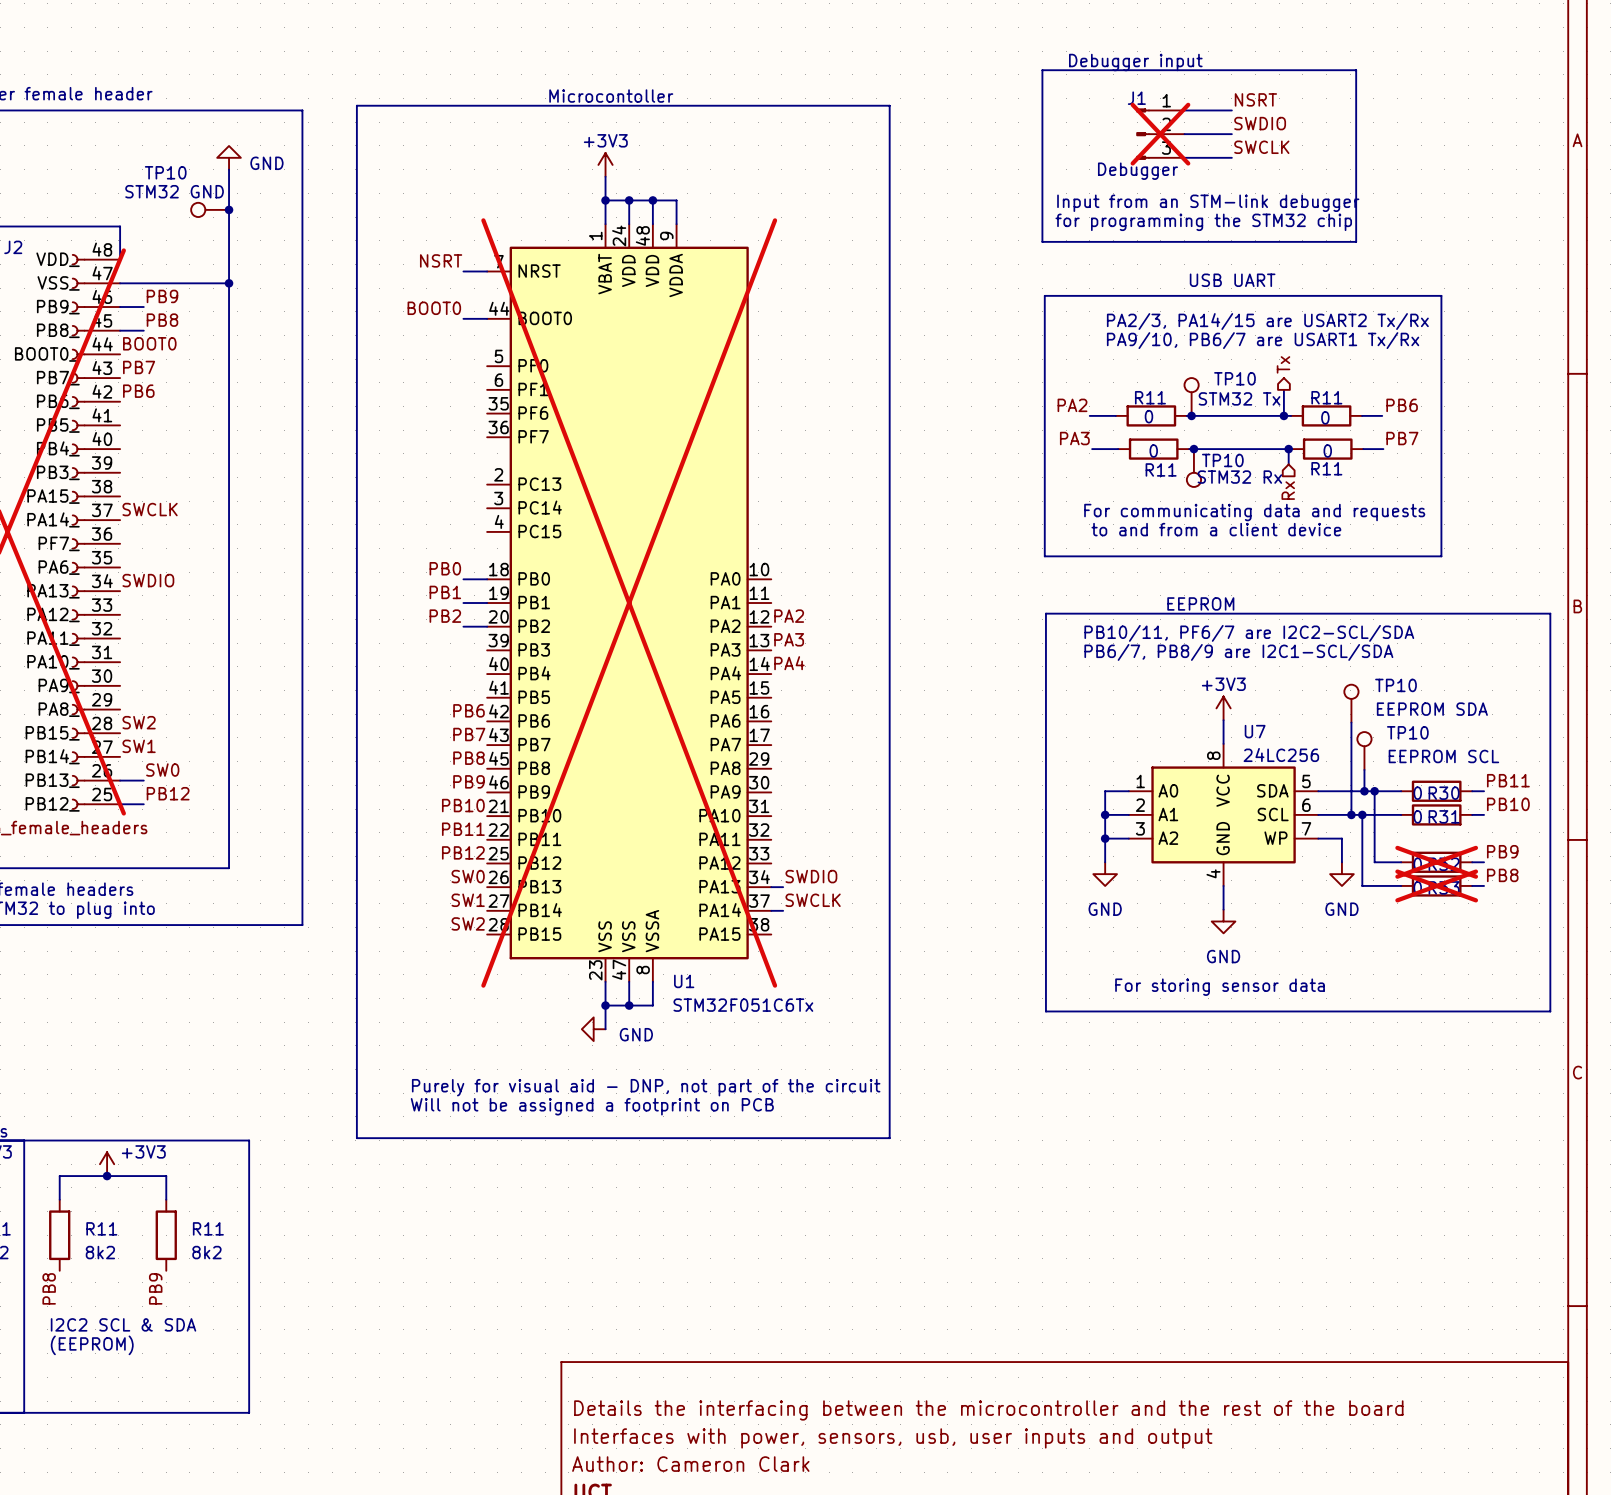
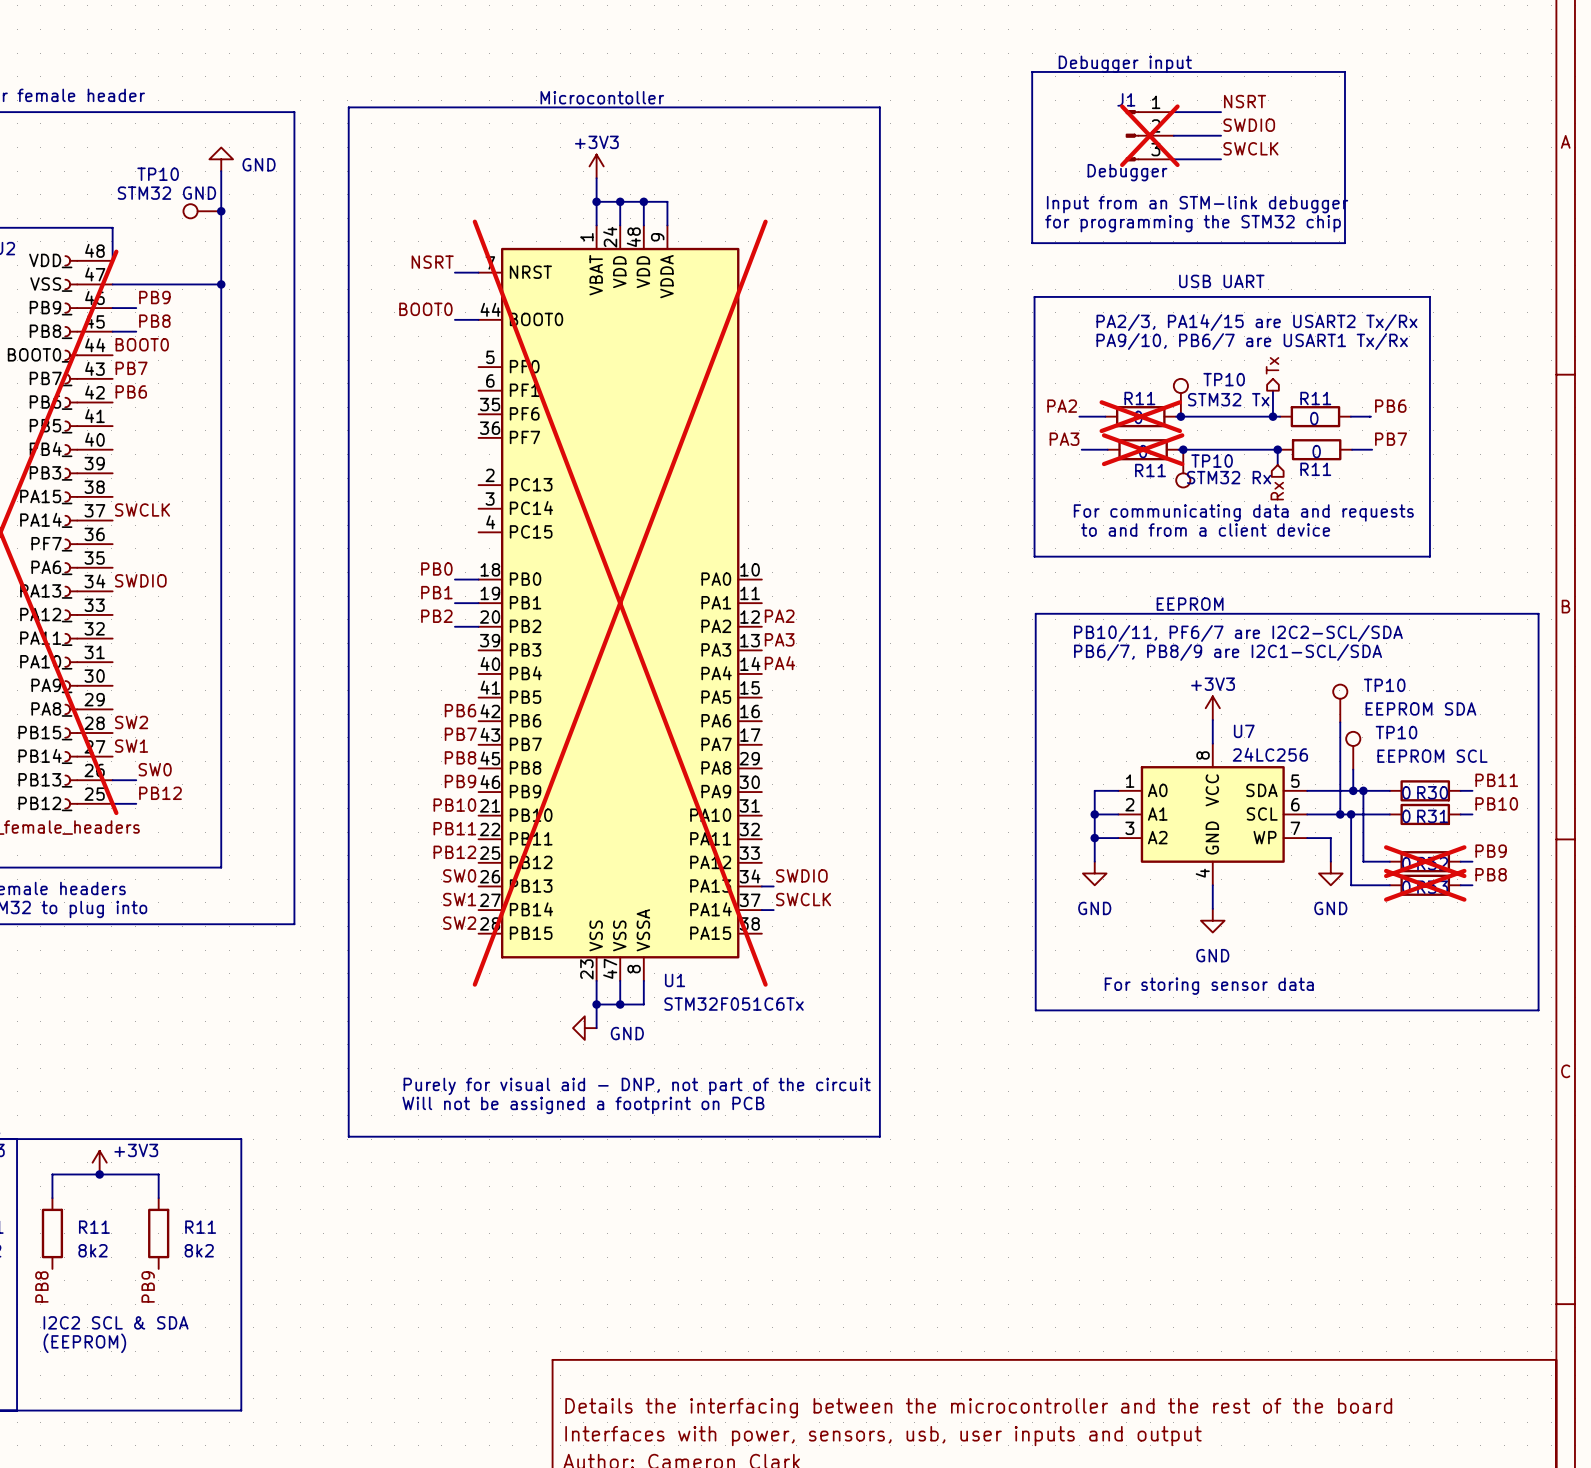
R11 do-not-place cross: none -> (1140, 416)
R11 do-not-place cross: none -> (1143, 449)

